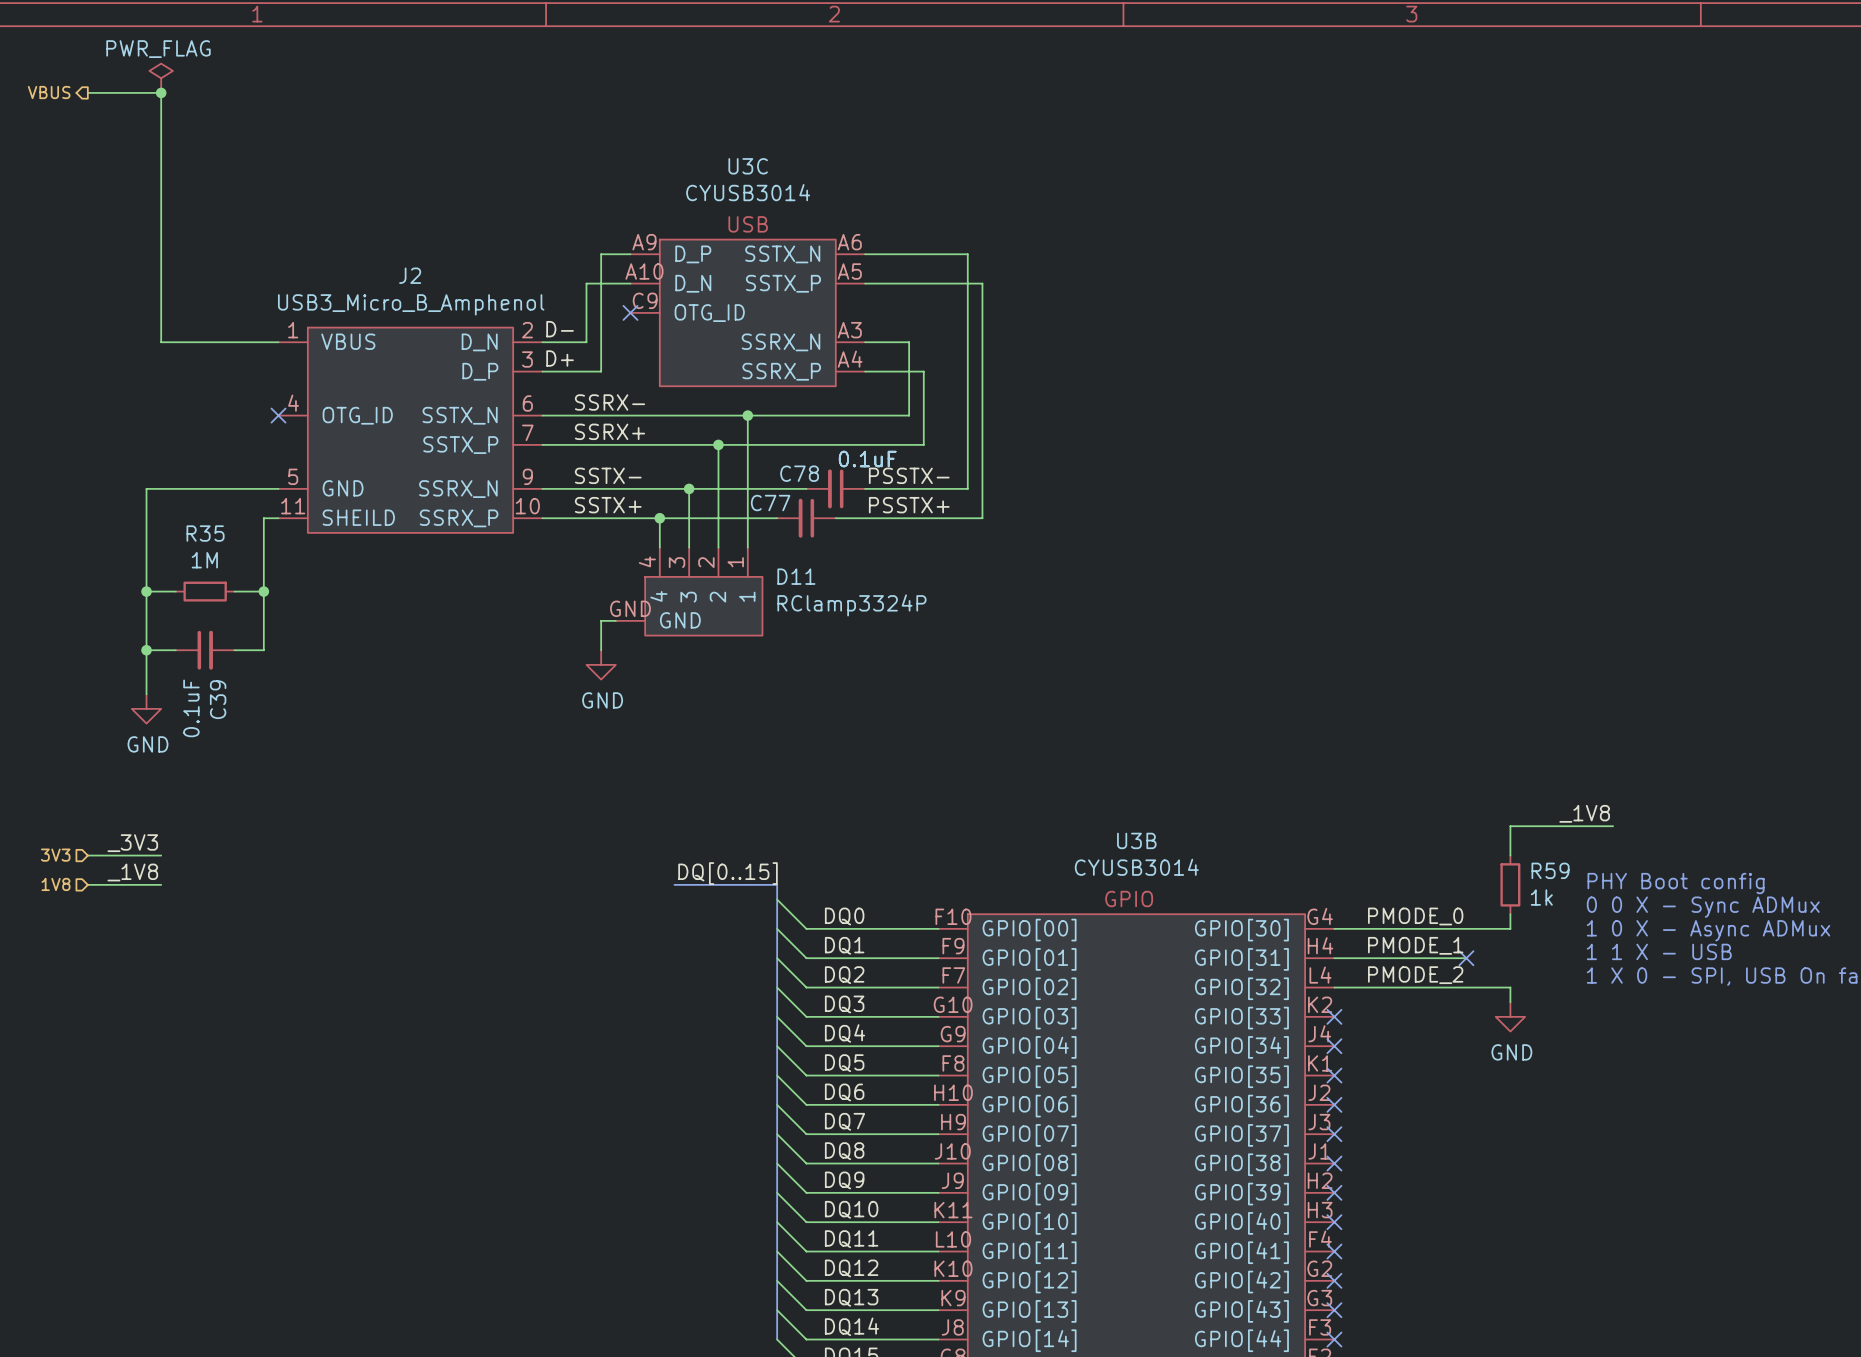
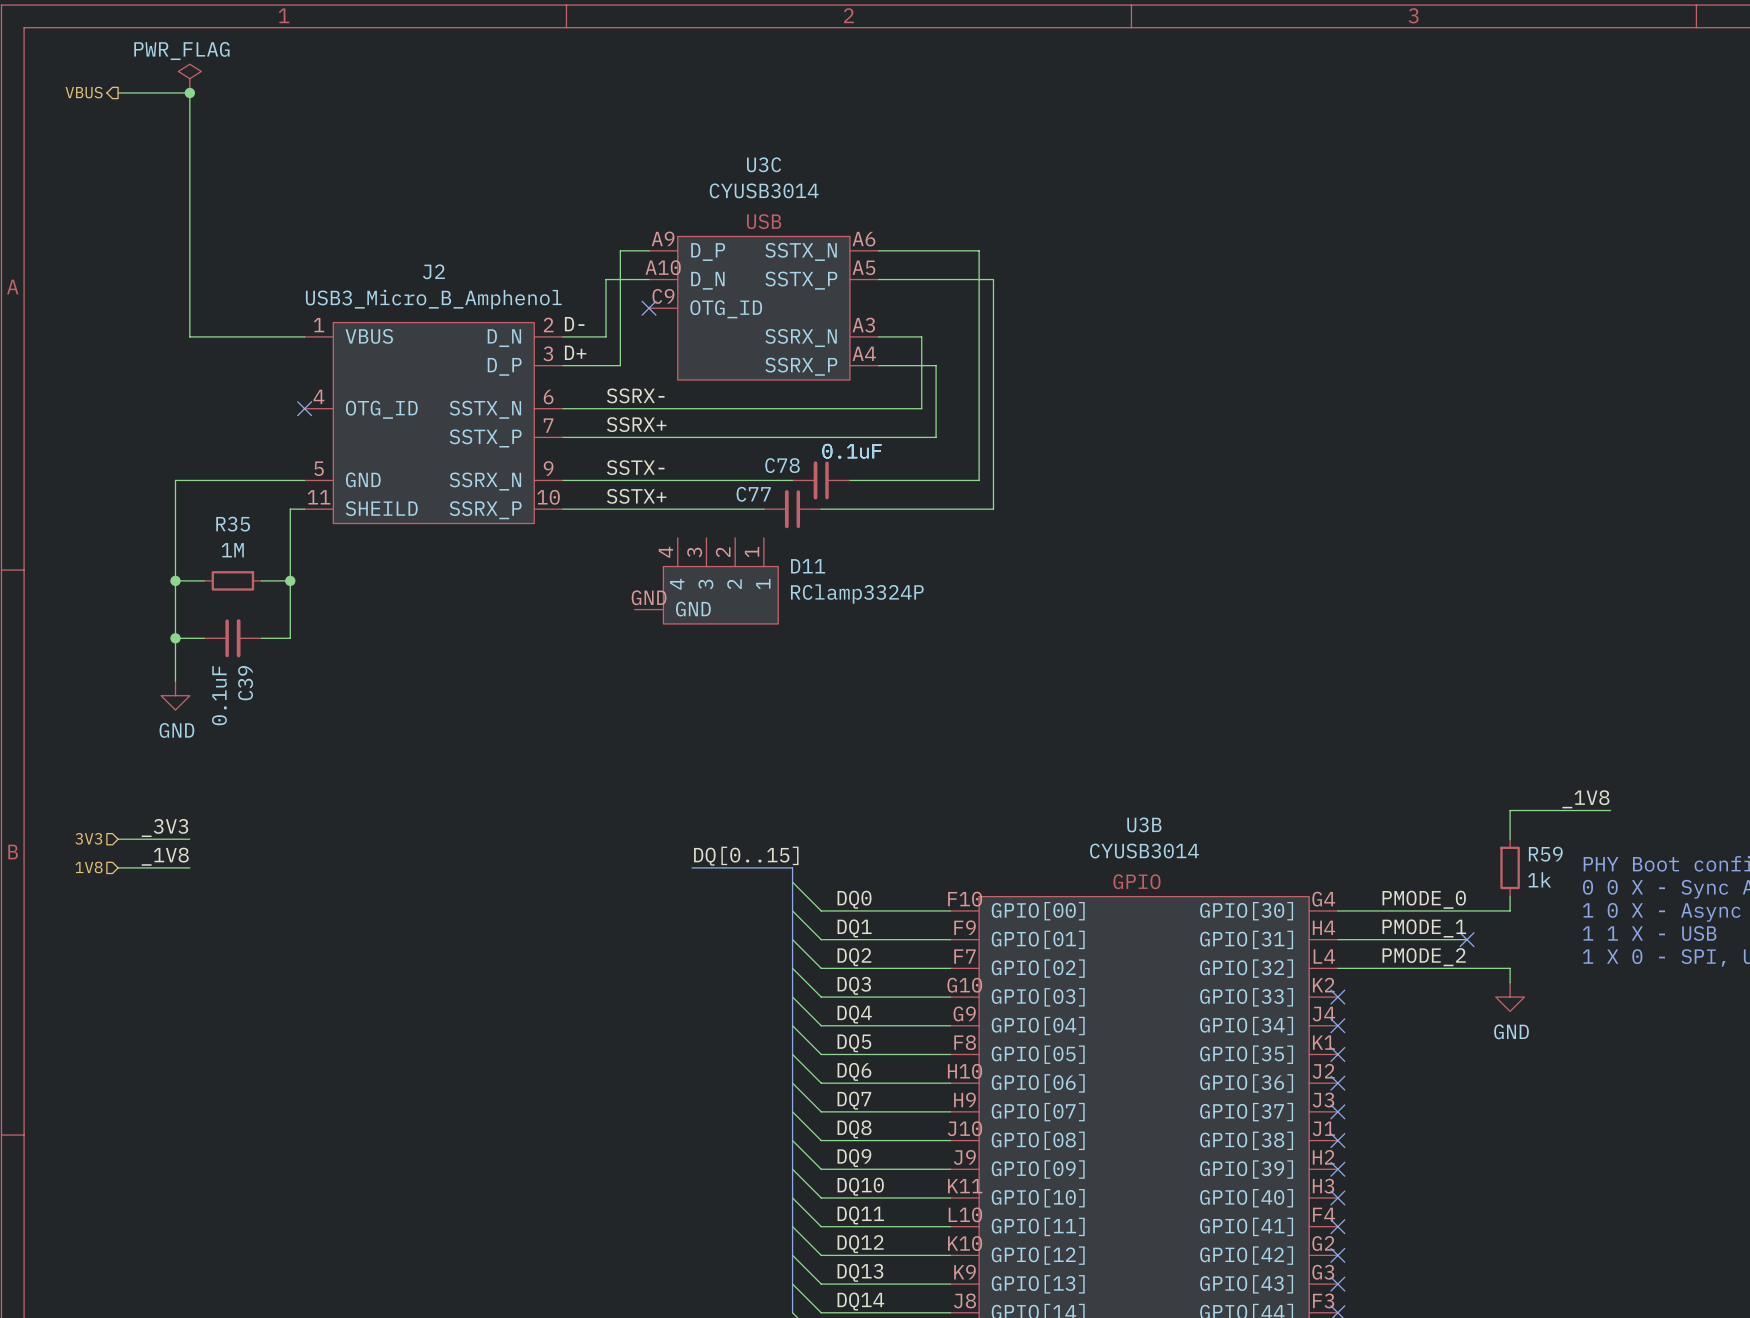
label position: SSRX- (609, 402) -> SSRX- (635, 395)
wire: (747, 415) (747, 547) -> none
junction: (747, 415) -> none
label position: SSRX+ (609, 431) -> SSRX+ (636, 424)
wire: (718, 444) (718, 547) -> none
junction: (718, 444) -> none
label position: SSTX- (608, 475) -> SSTX- (635, 467)
label: PSSTX- (909, 475) -> none
wire: (689, 488) (689, 547) -> none
junction: (689, 488) -> none
C78 position: (835, 488) -> (821, 480)
label position: SSTX+ (608, 505) -> SSTX+ (636, 496)
label: PSSTX+ (909, 505) -> none
wire: (659, 518) (659, 547) -> none
junction: (659, 518) -> none
C77 position: (806, 518) -> (792, 509)
wire: (615, 620) (601, 620) (601, 650) -> none
power symbol: GND (601, 664) -> none

